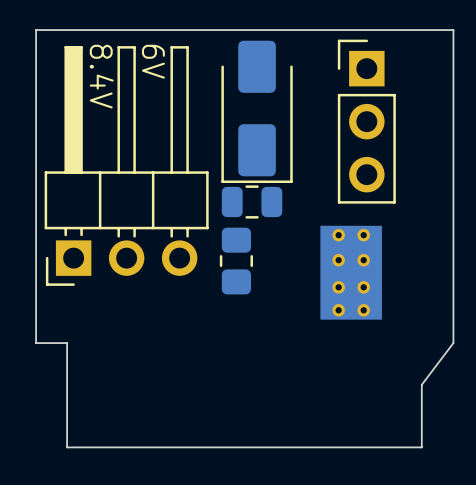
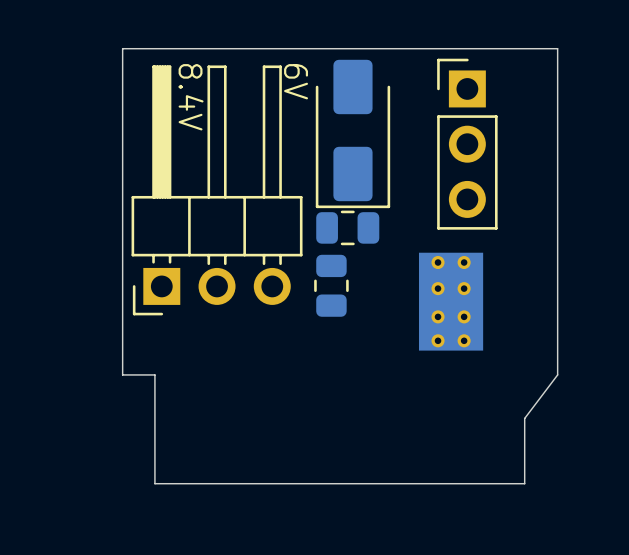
text position: 6V (153, 61) -> 6V (296, 81)
part footprint: [219, 227, 253, 295] -> [314, 254, 349, 317]

